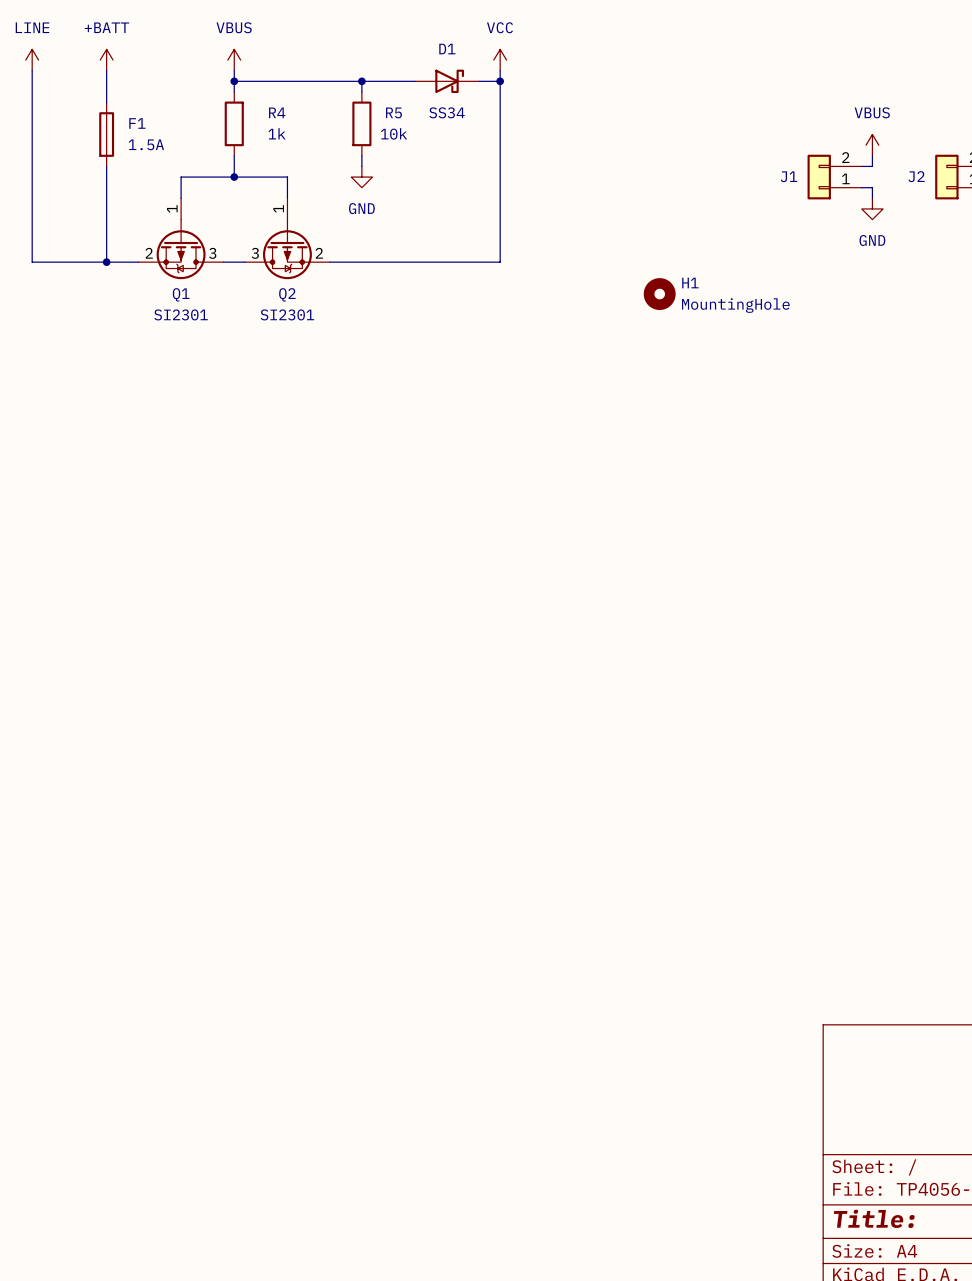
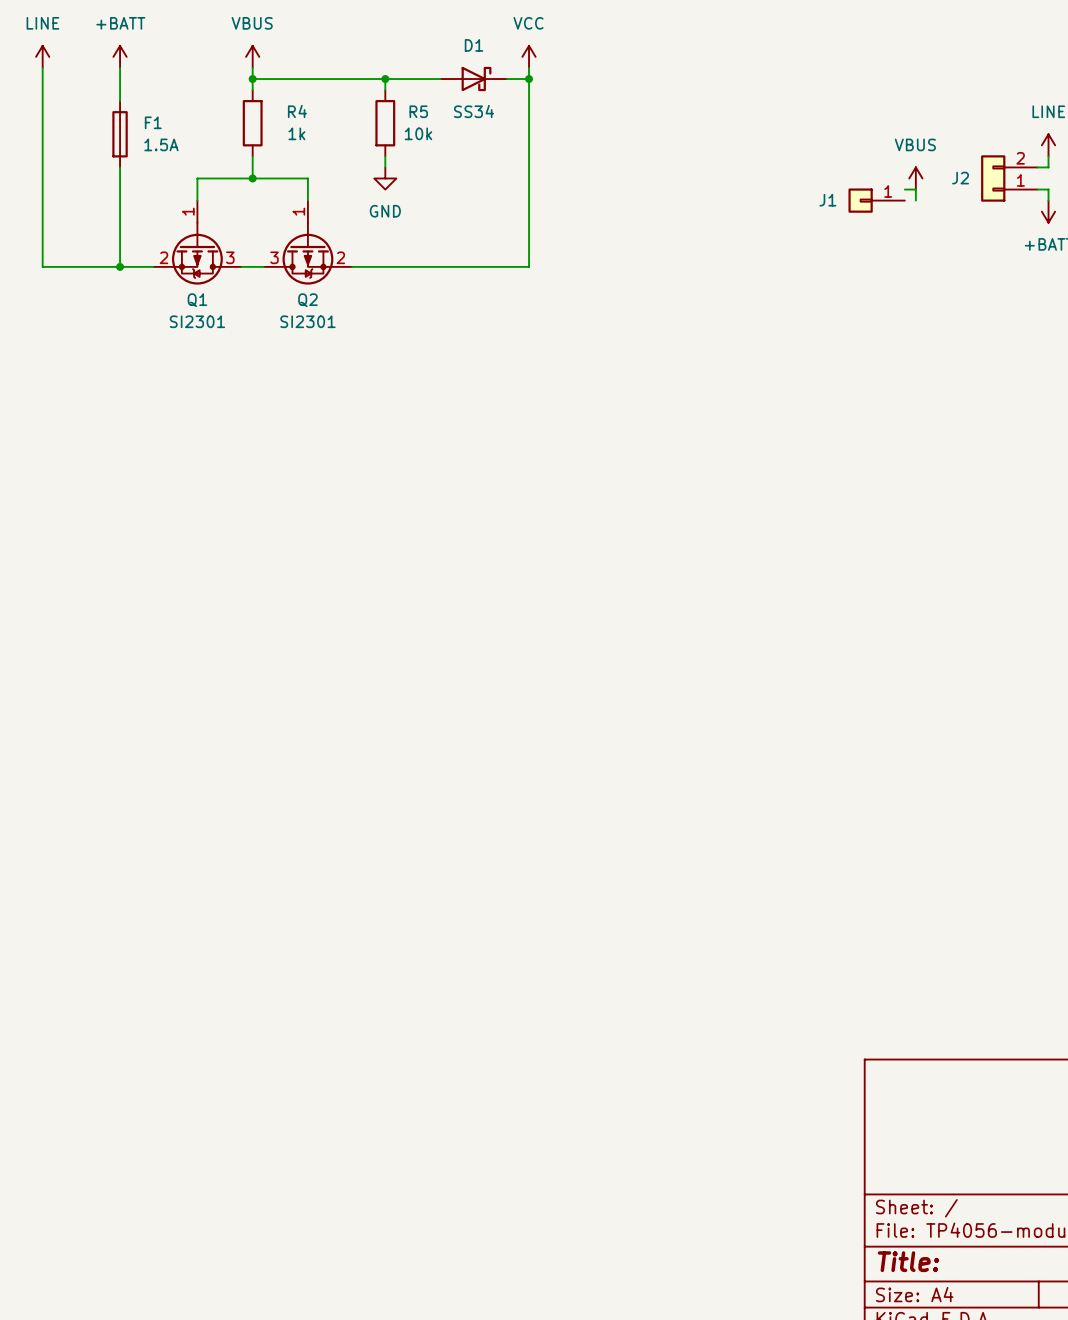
power symbol position: VBUS (872, 145) -> VBUS (915, 178)
J1 symbol: [807, 154, 862, 200] -> [848, 188, 905, 213]
wire: (872, 155) (872, 166) (861, 166) -> none
power symbol: GND (872, 208) -> none
H1: MountingHole (659, 294) -> none

